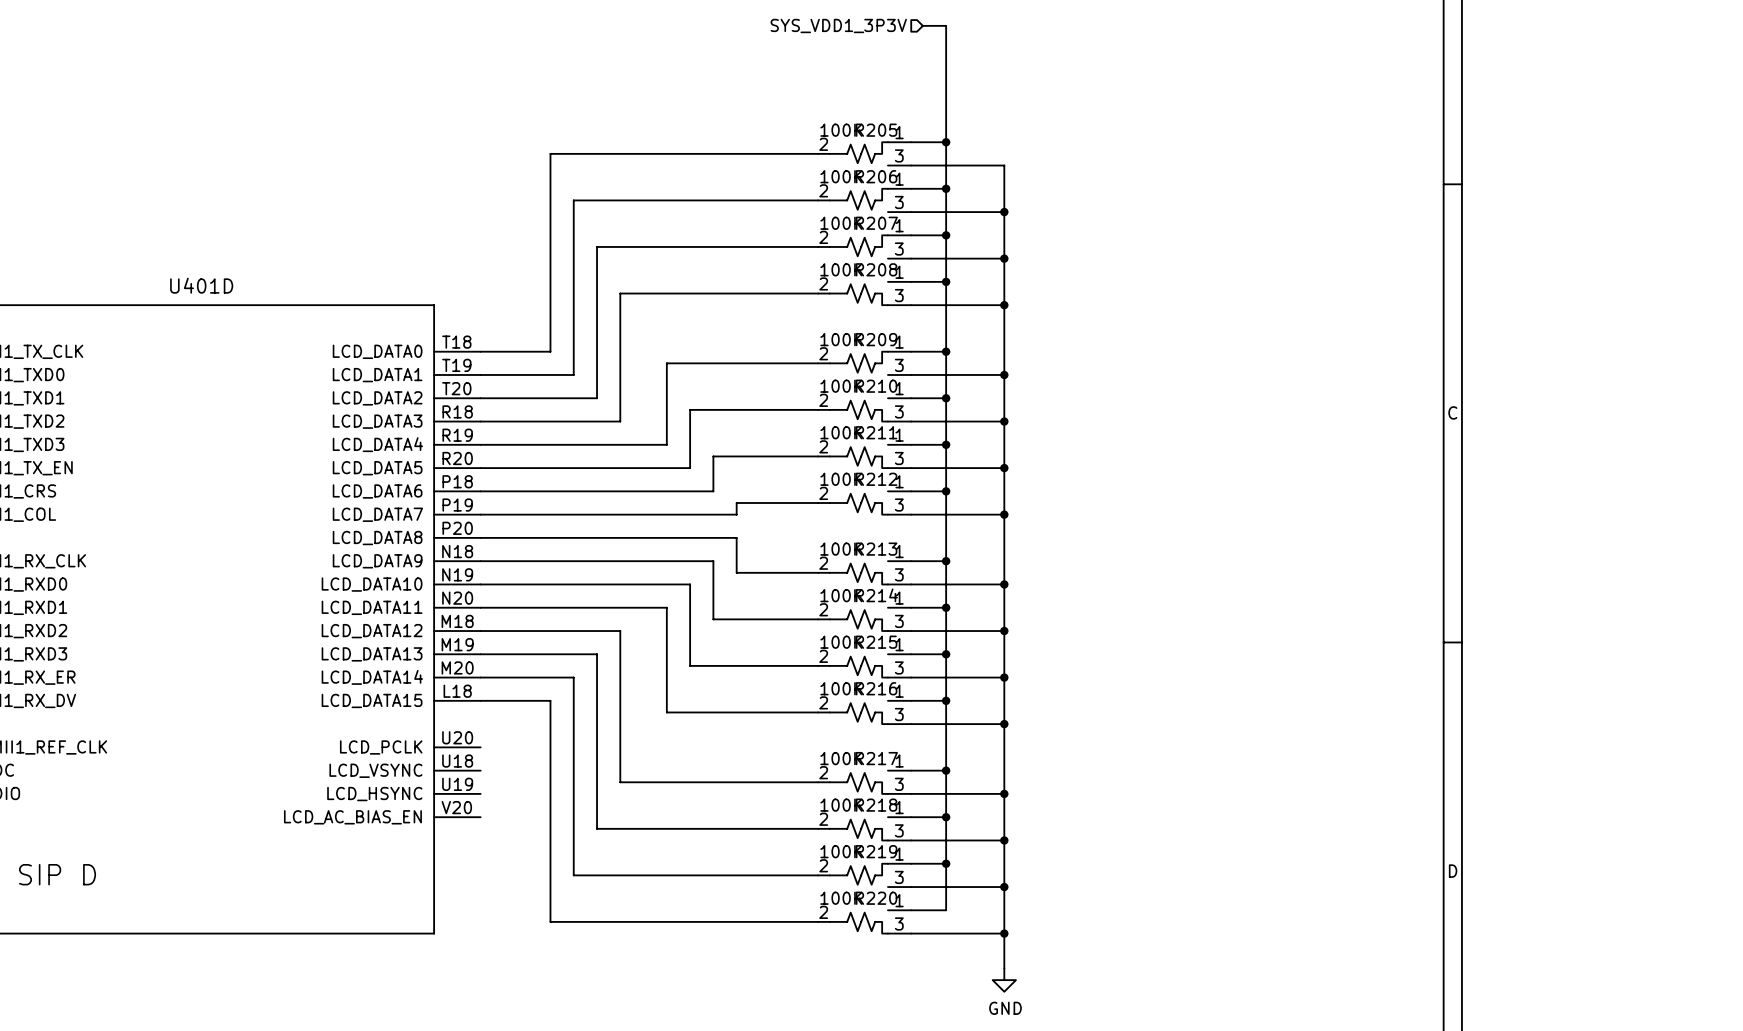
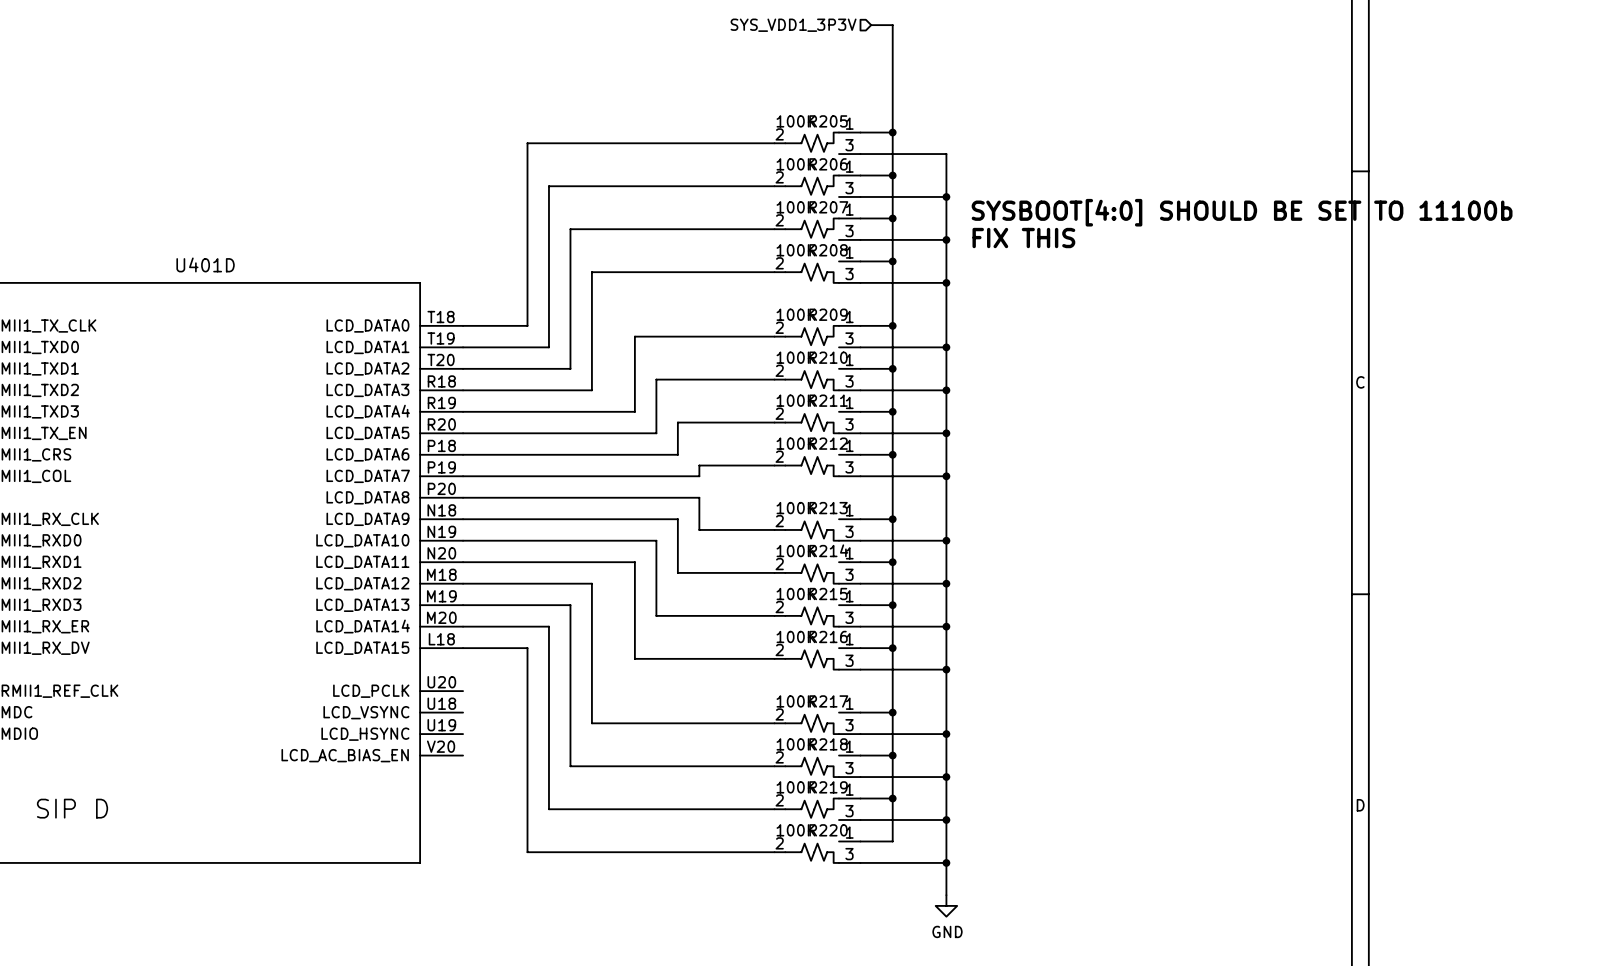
text: none -> SYSBOOT[4:0] SHOULD BE SET TO 11100b (1242, 212)
text: none -> FIX THIS (1023, 238)

